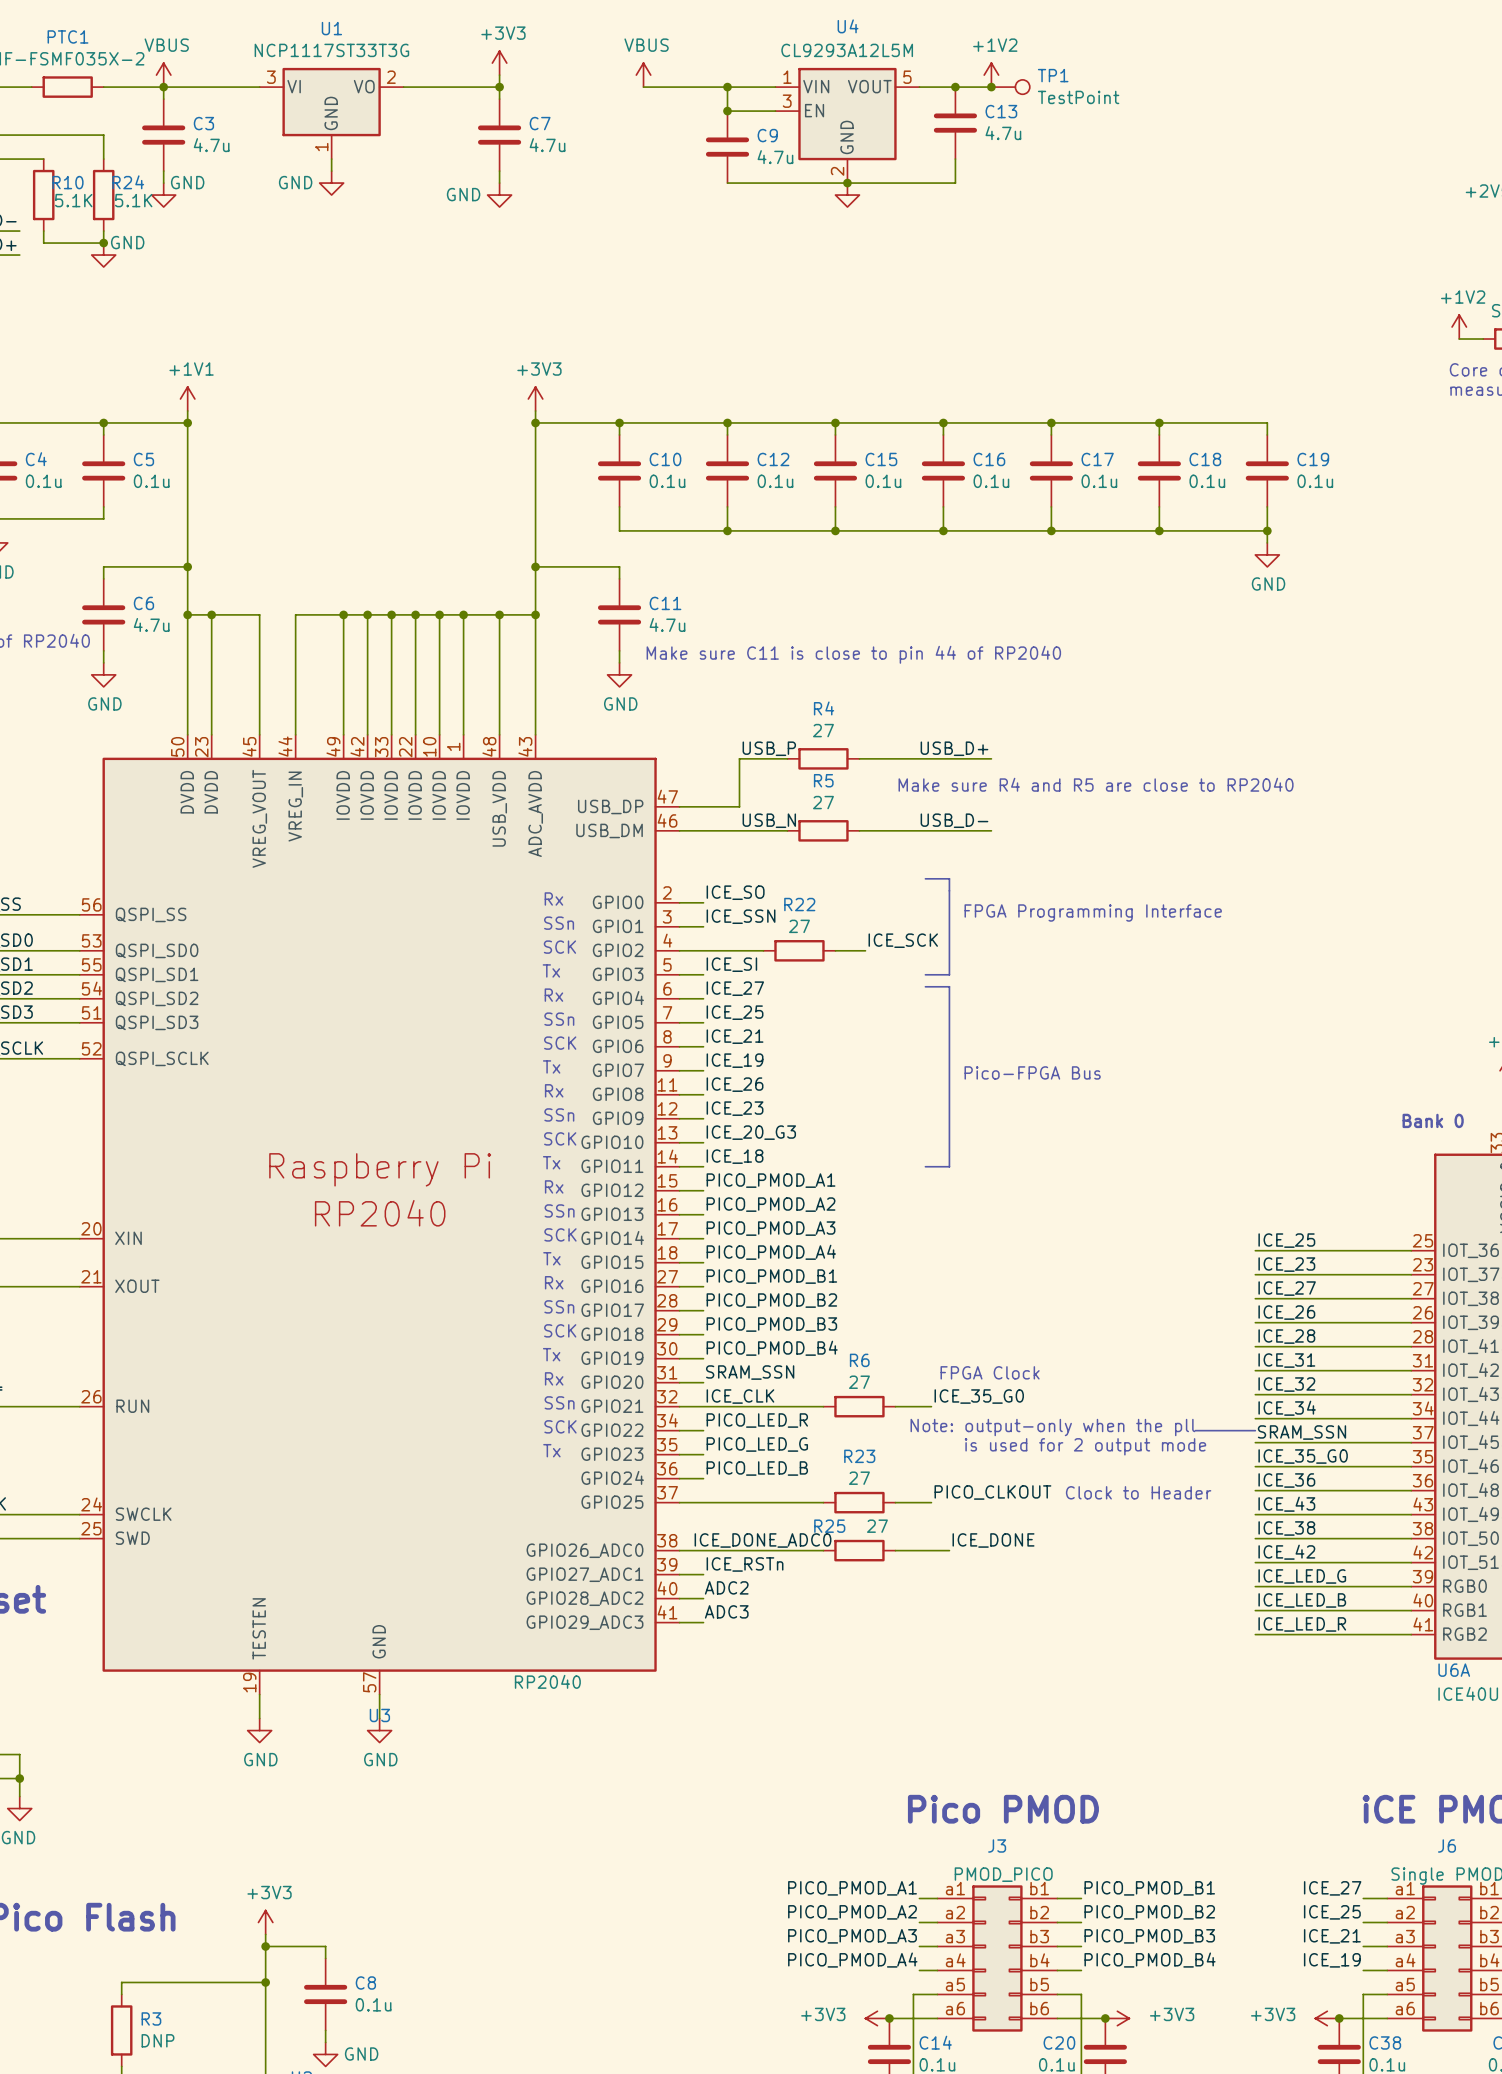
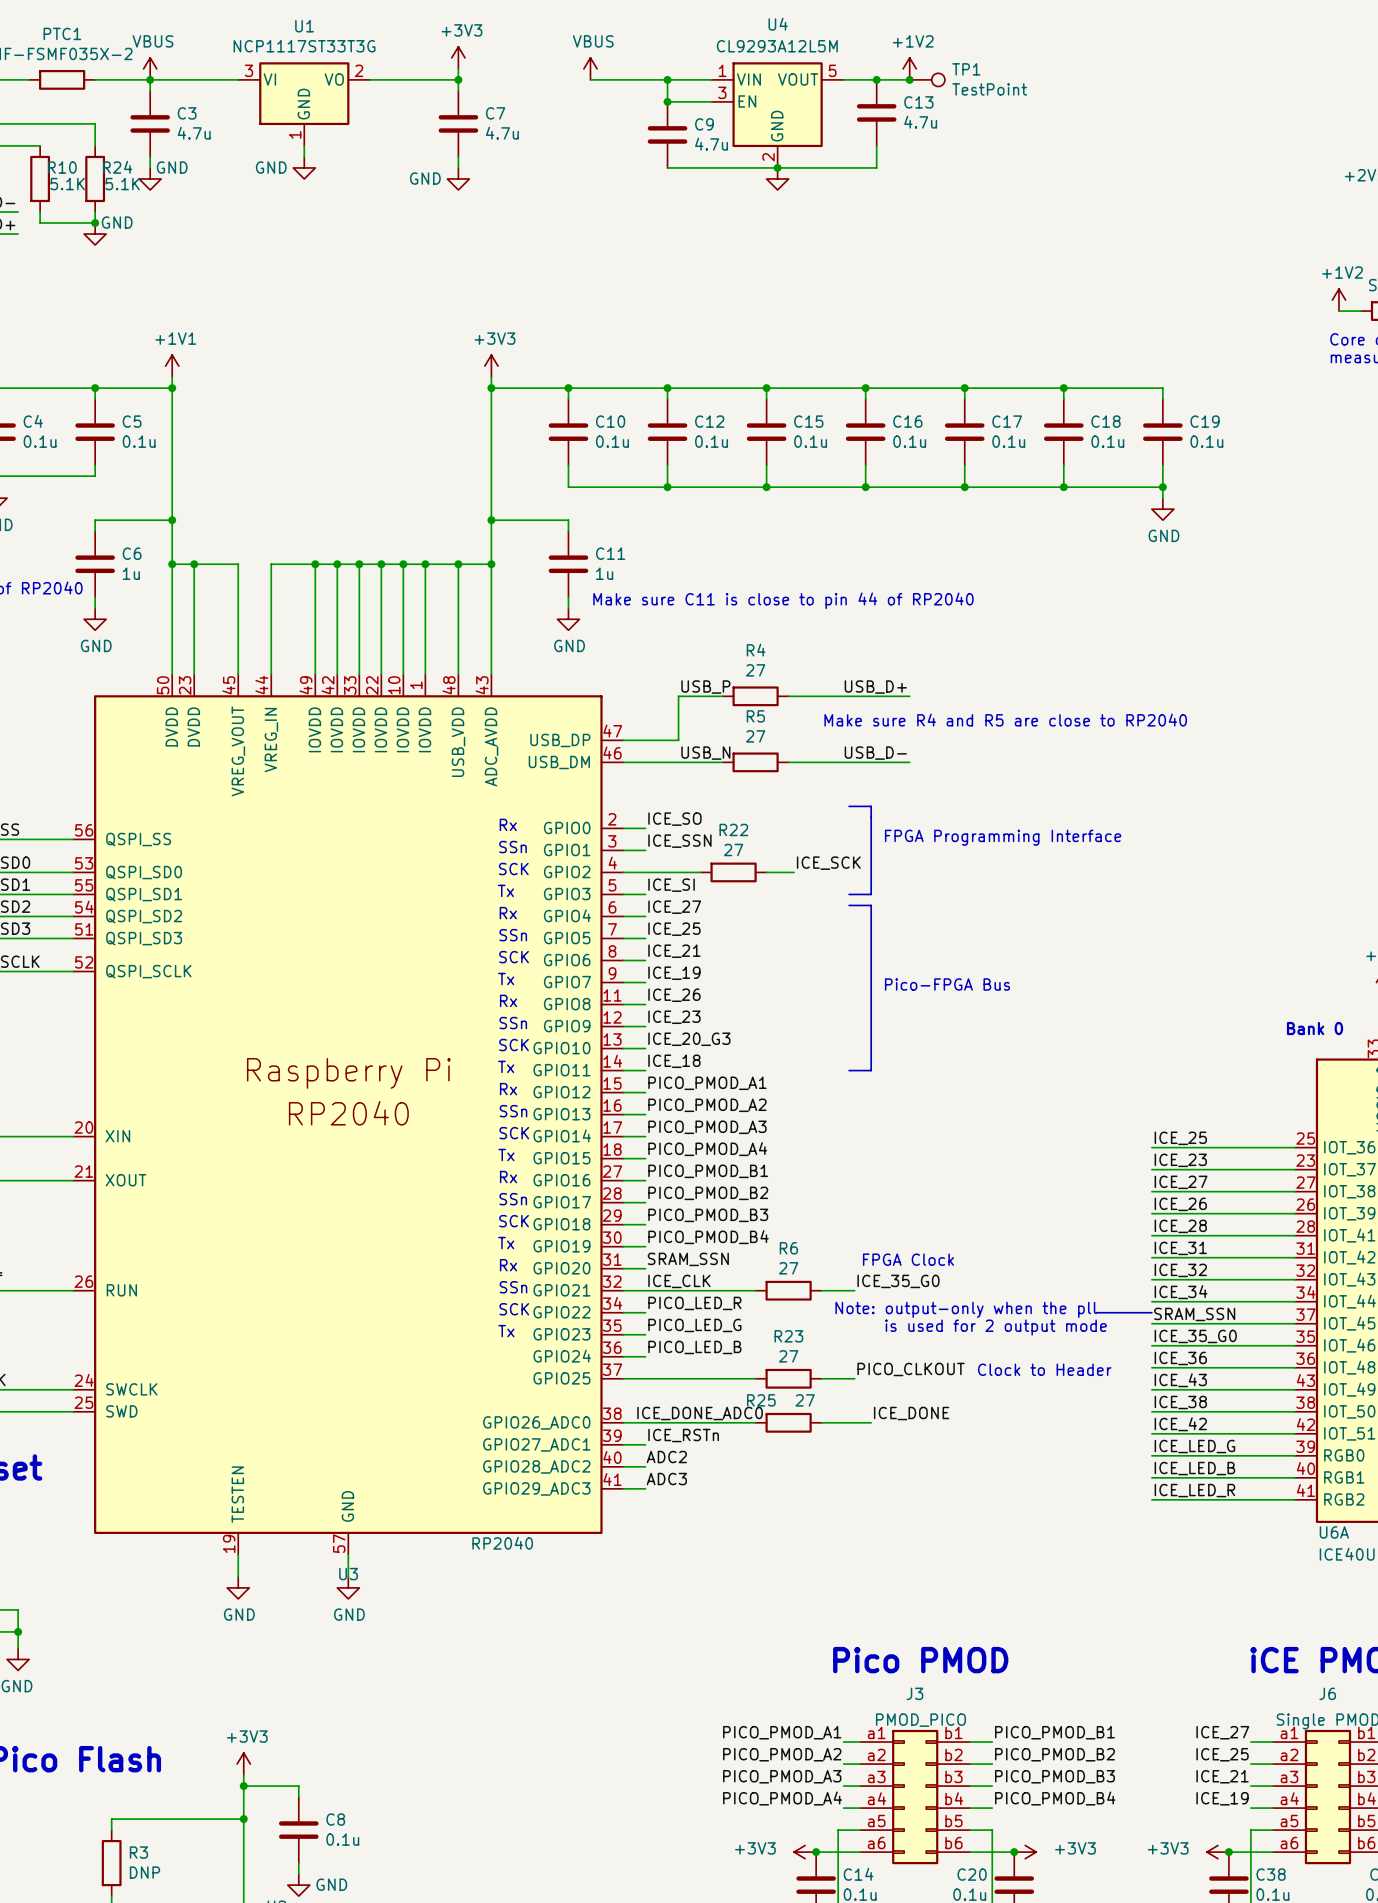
C6 value: 4.7u (151, 624) -> 1u (131, 573)
C11 value: 4.7u (667, 624) -> 1u (604, 573)

